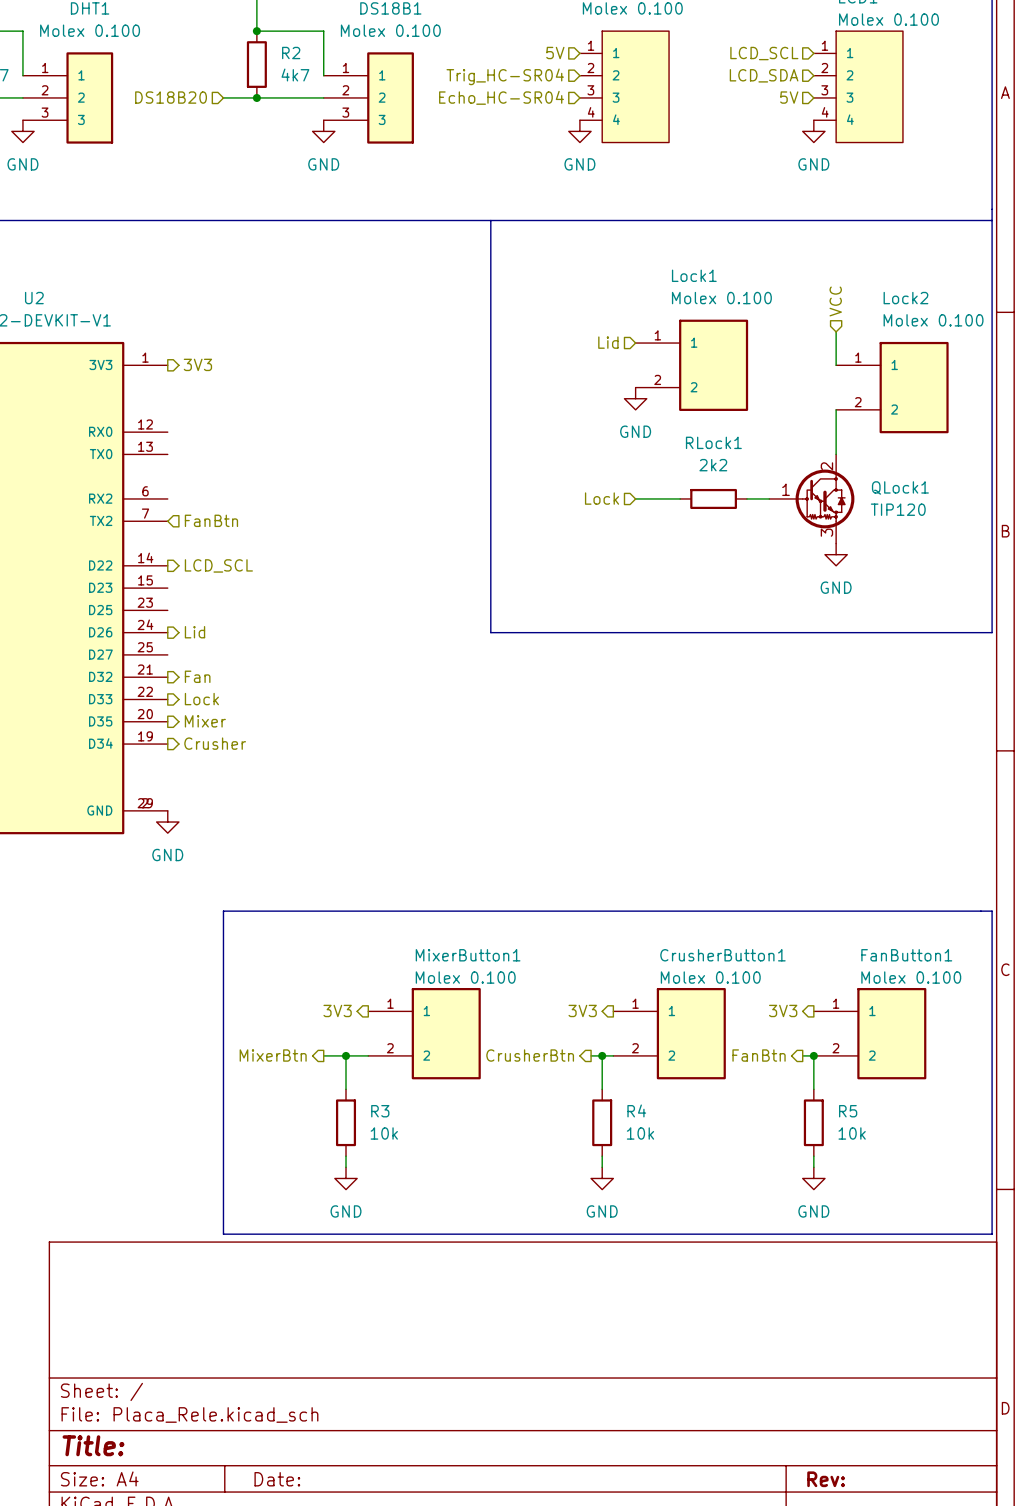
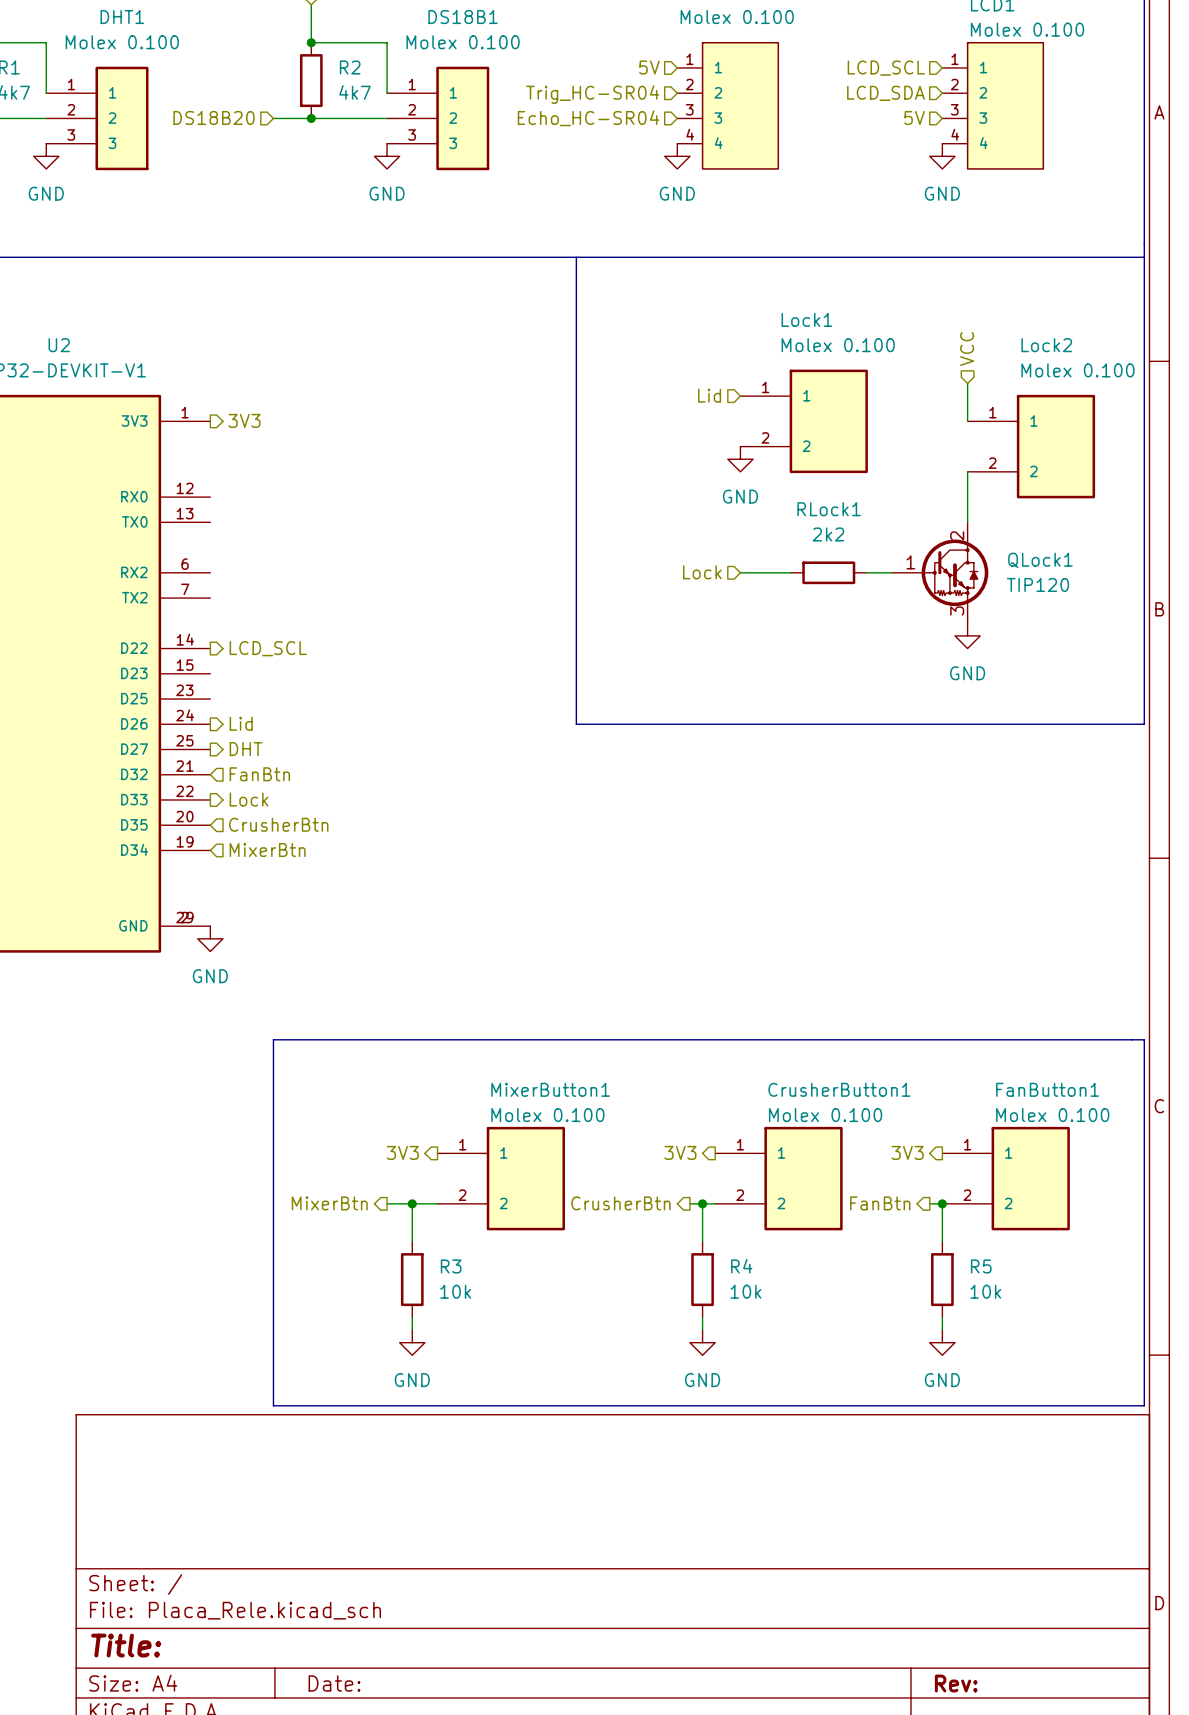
hierarchical label: FanBtn (211, 520) -> none
hierarchical label: none -> DHT (246, 749)
hierarchical label shape: output (197, 676) -> input (259, 774)
hierarchical label: Fan (197, 676) -> FanBtn (259, 774)
hierarchical label shape: output (205, 721) -> input (278, 824)
hierarchical label: Mixer (205, 721) -> CrusherBtn (278, 824)
hierarchical label shape: output (215, 743) -> input (267, 850)
hierarchical label: Crusher (215, 743) -> MixerBtn (267, 850)

